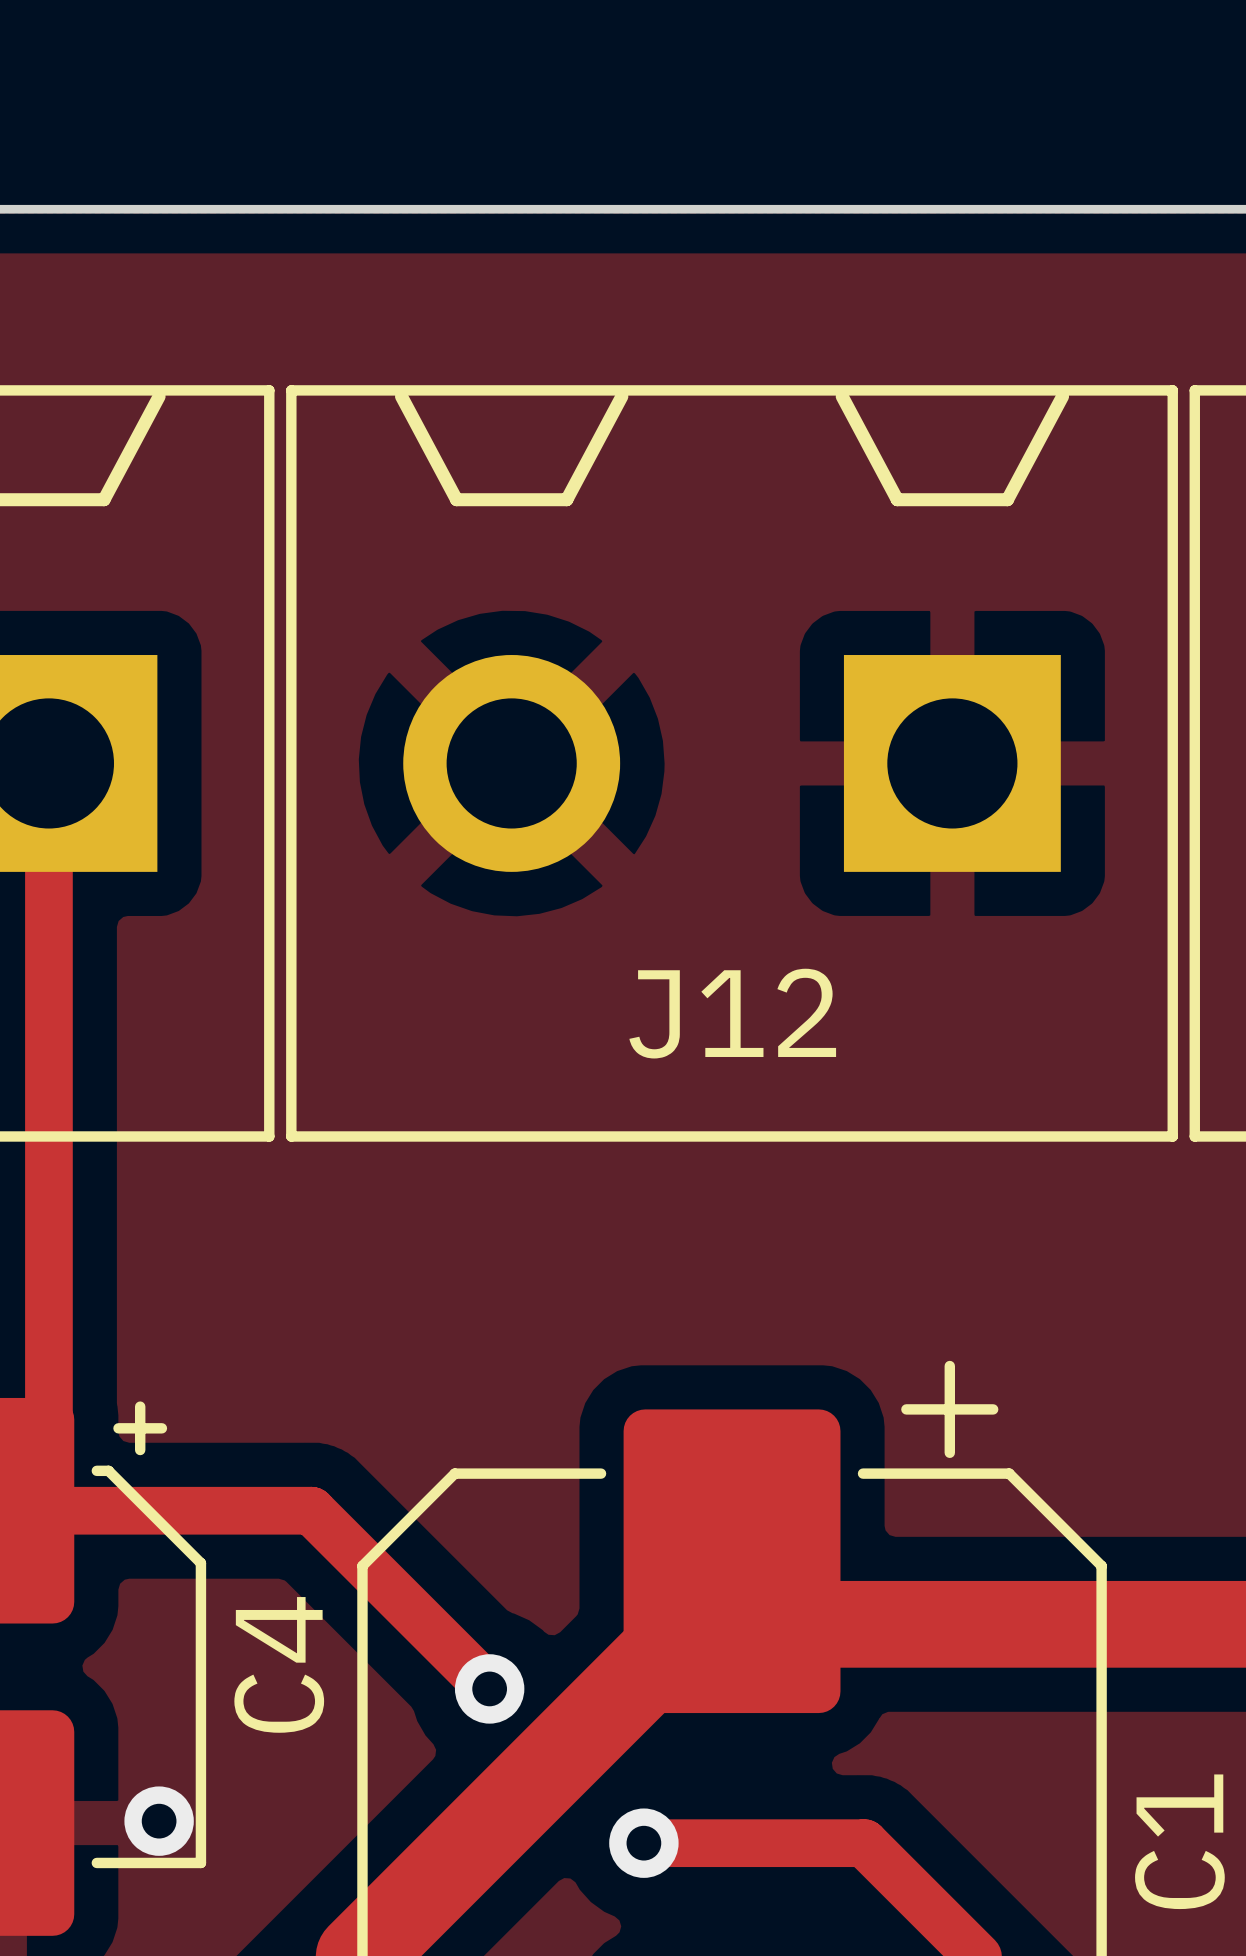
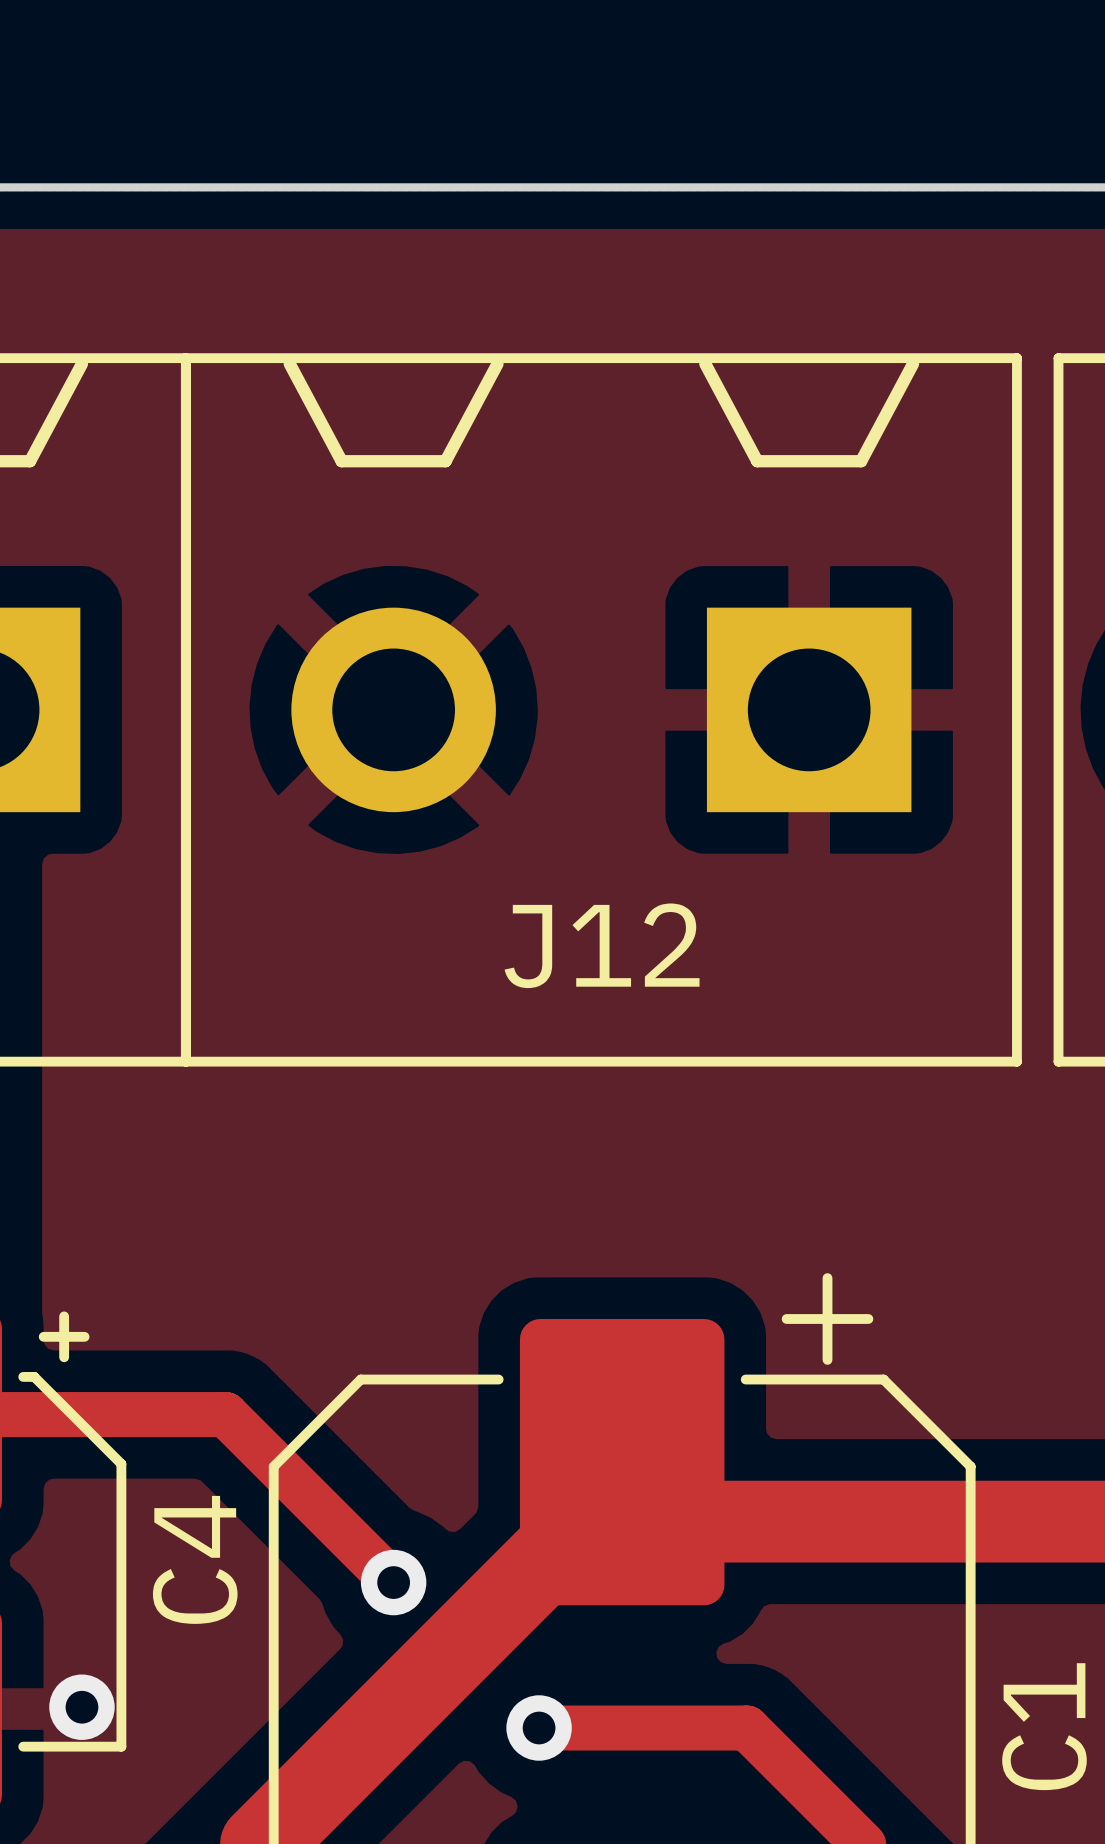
J12 position: (732, 763) -> (601, 709)

